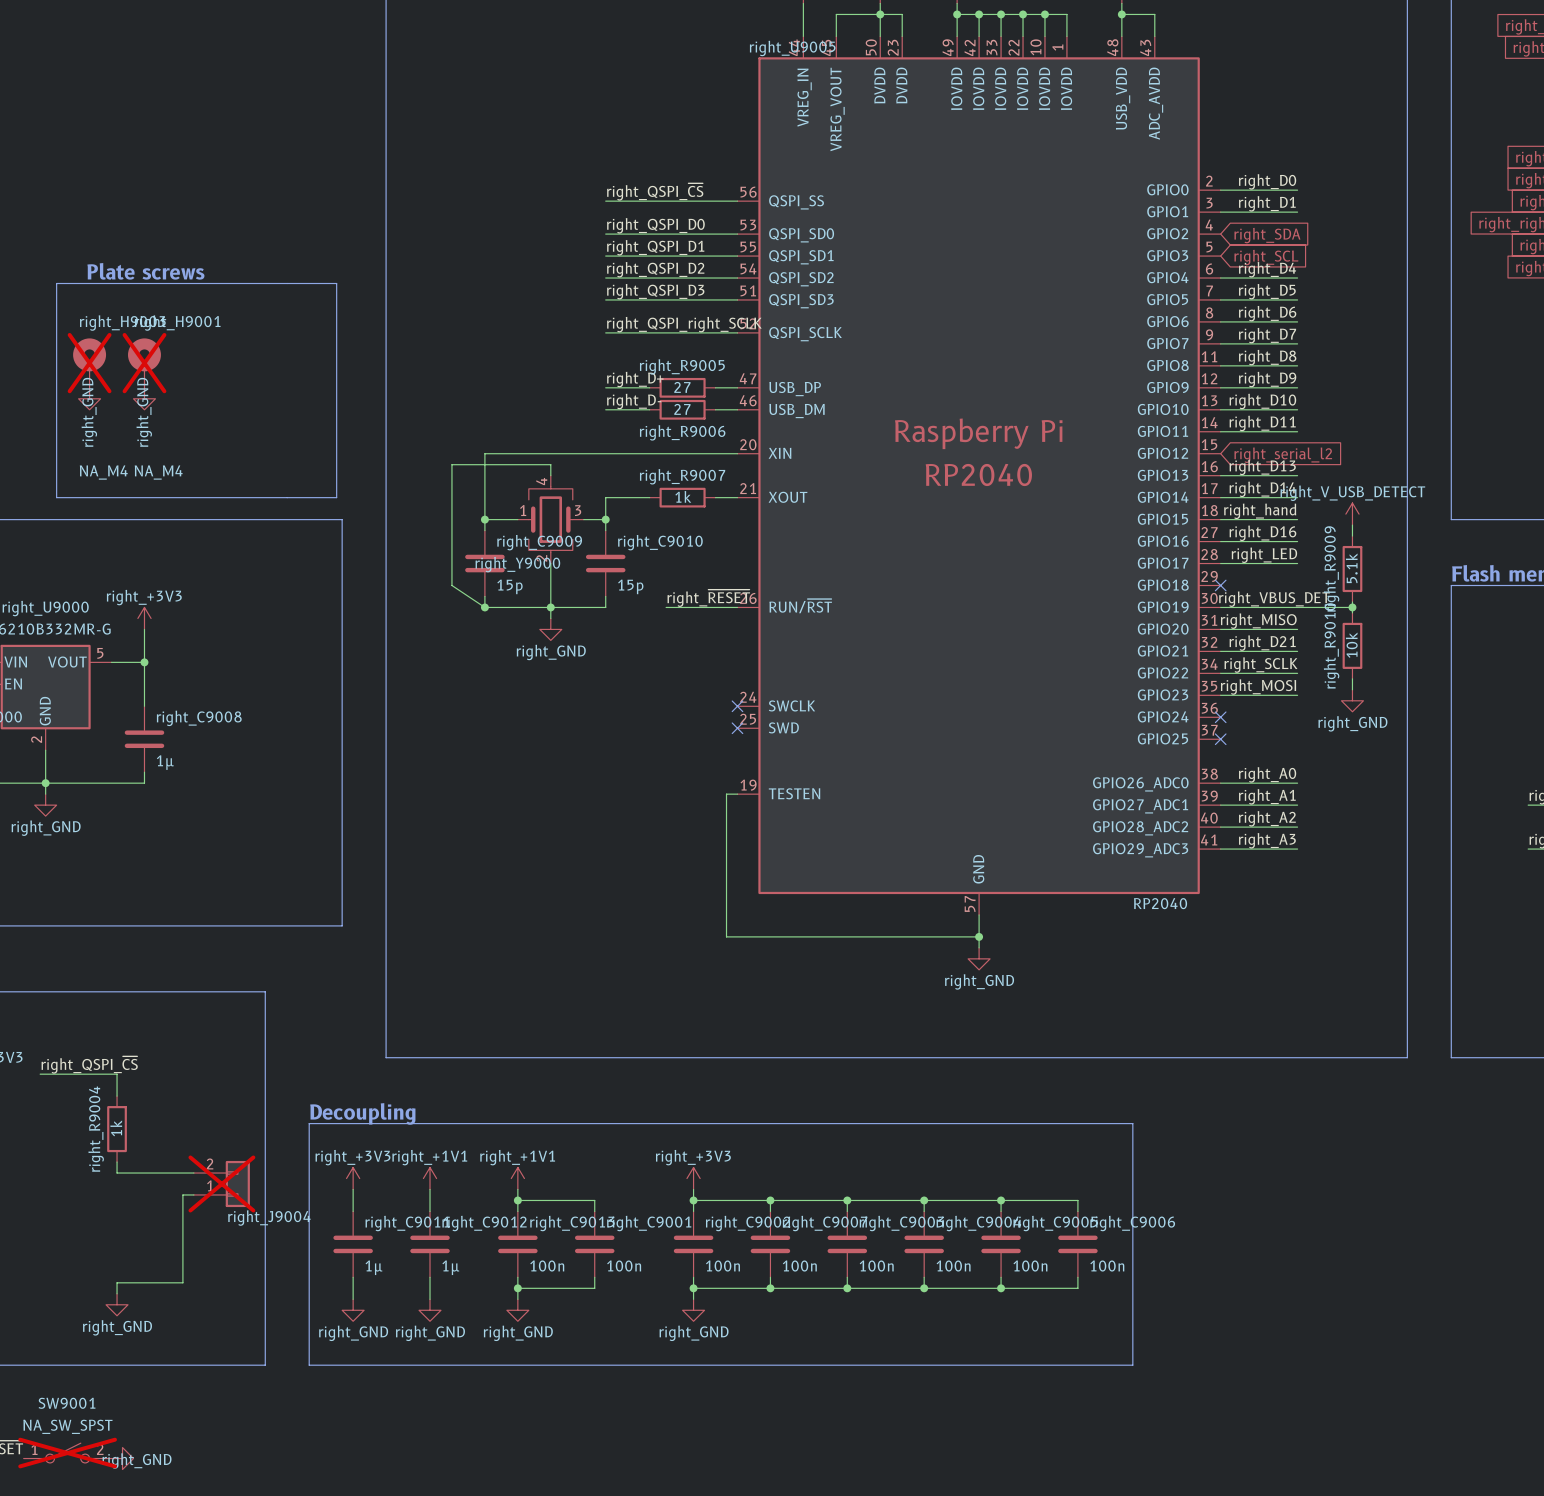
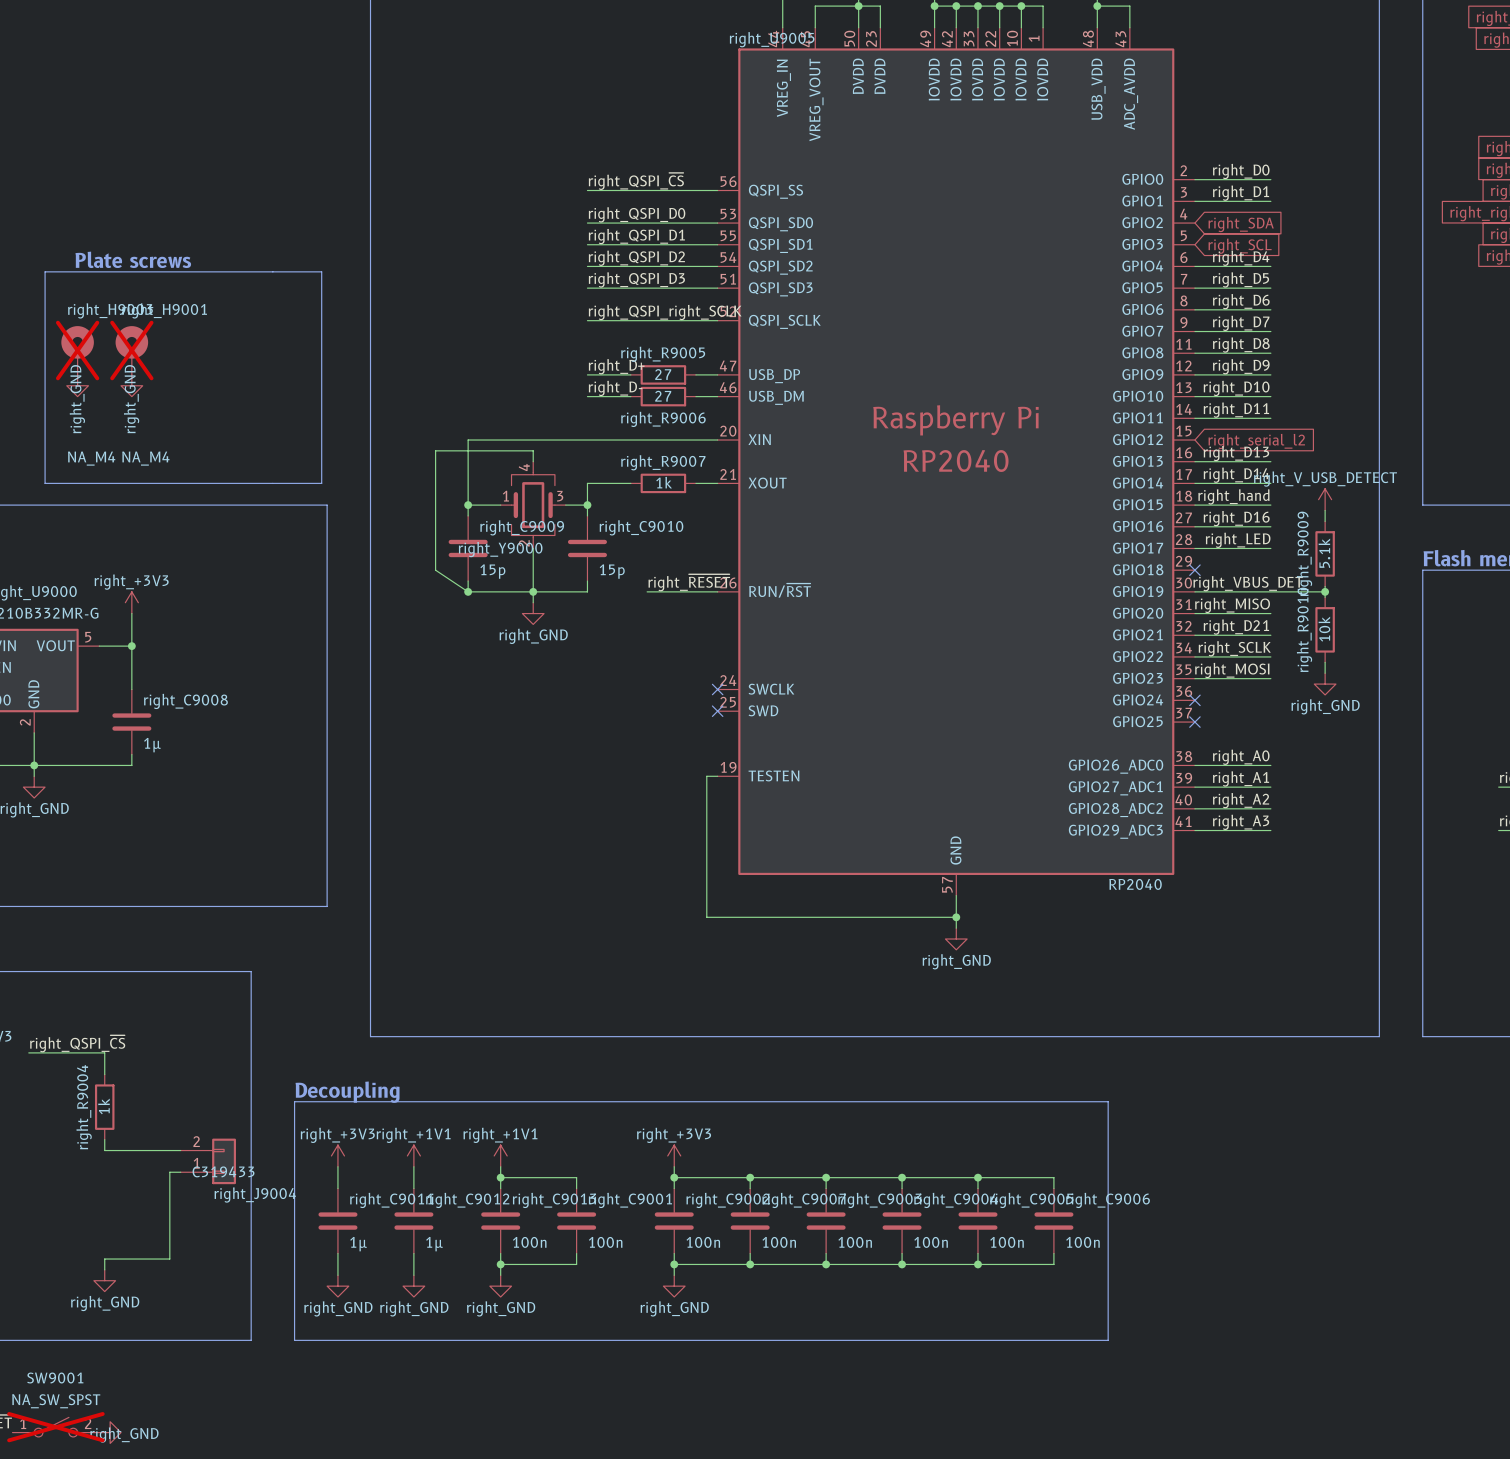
right_J9004 do-not-place cross: (221, 1183) -> none
right_J9004 text: none -> C319433 (223, 1171)

